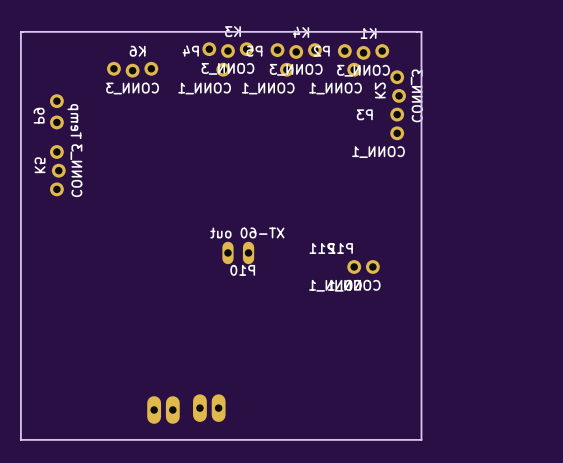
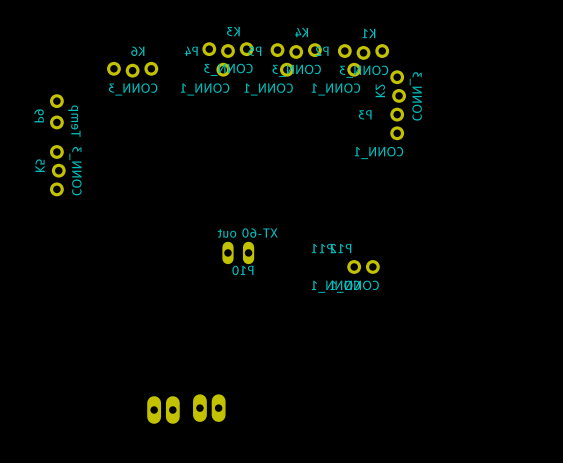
board edge: (421, 31) (20, 31) (20, 439) (421, 439) (421, 31) -> none

